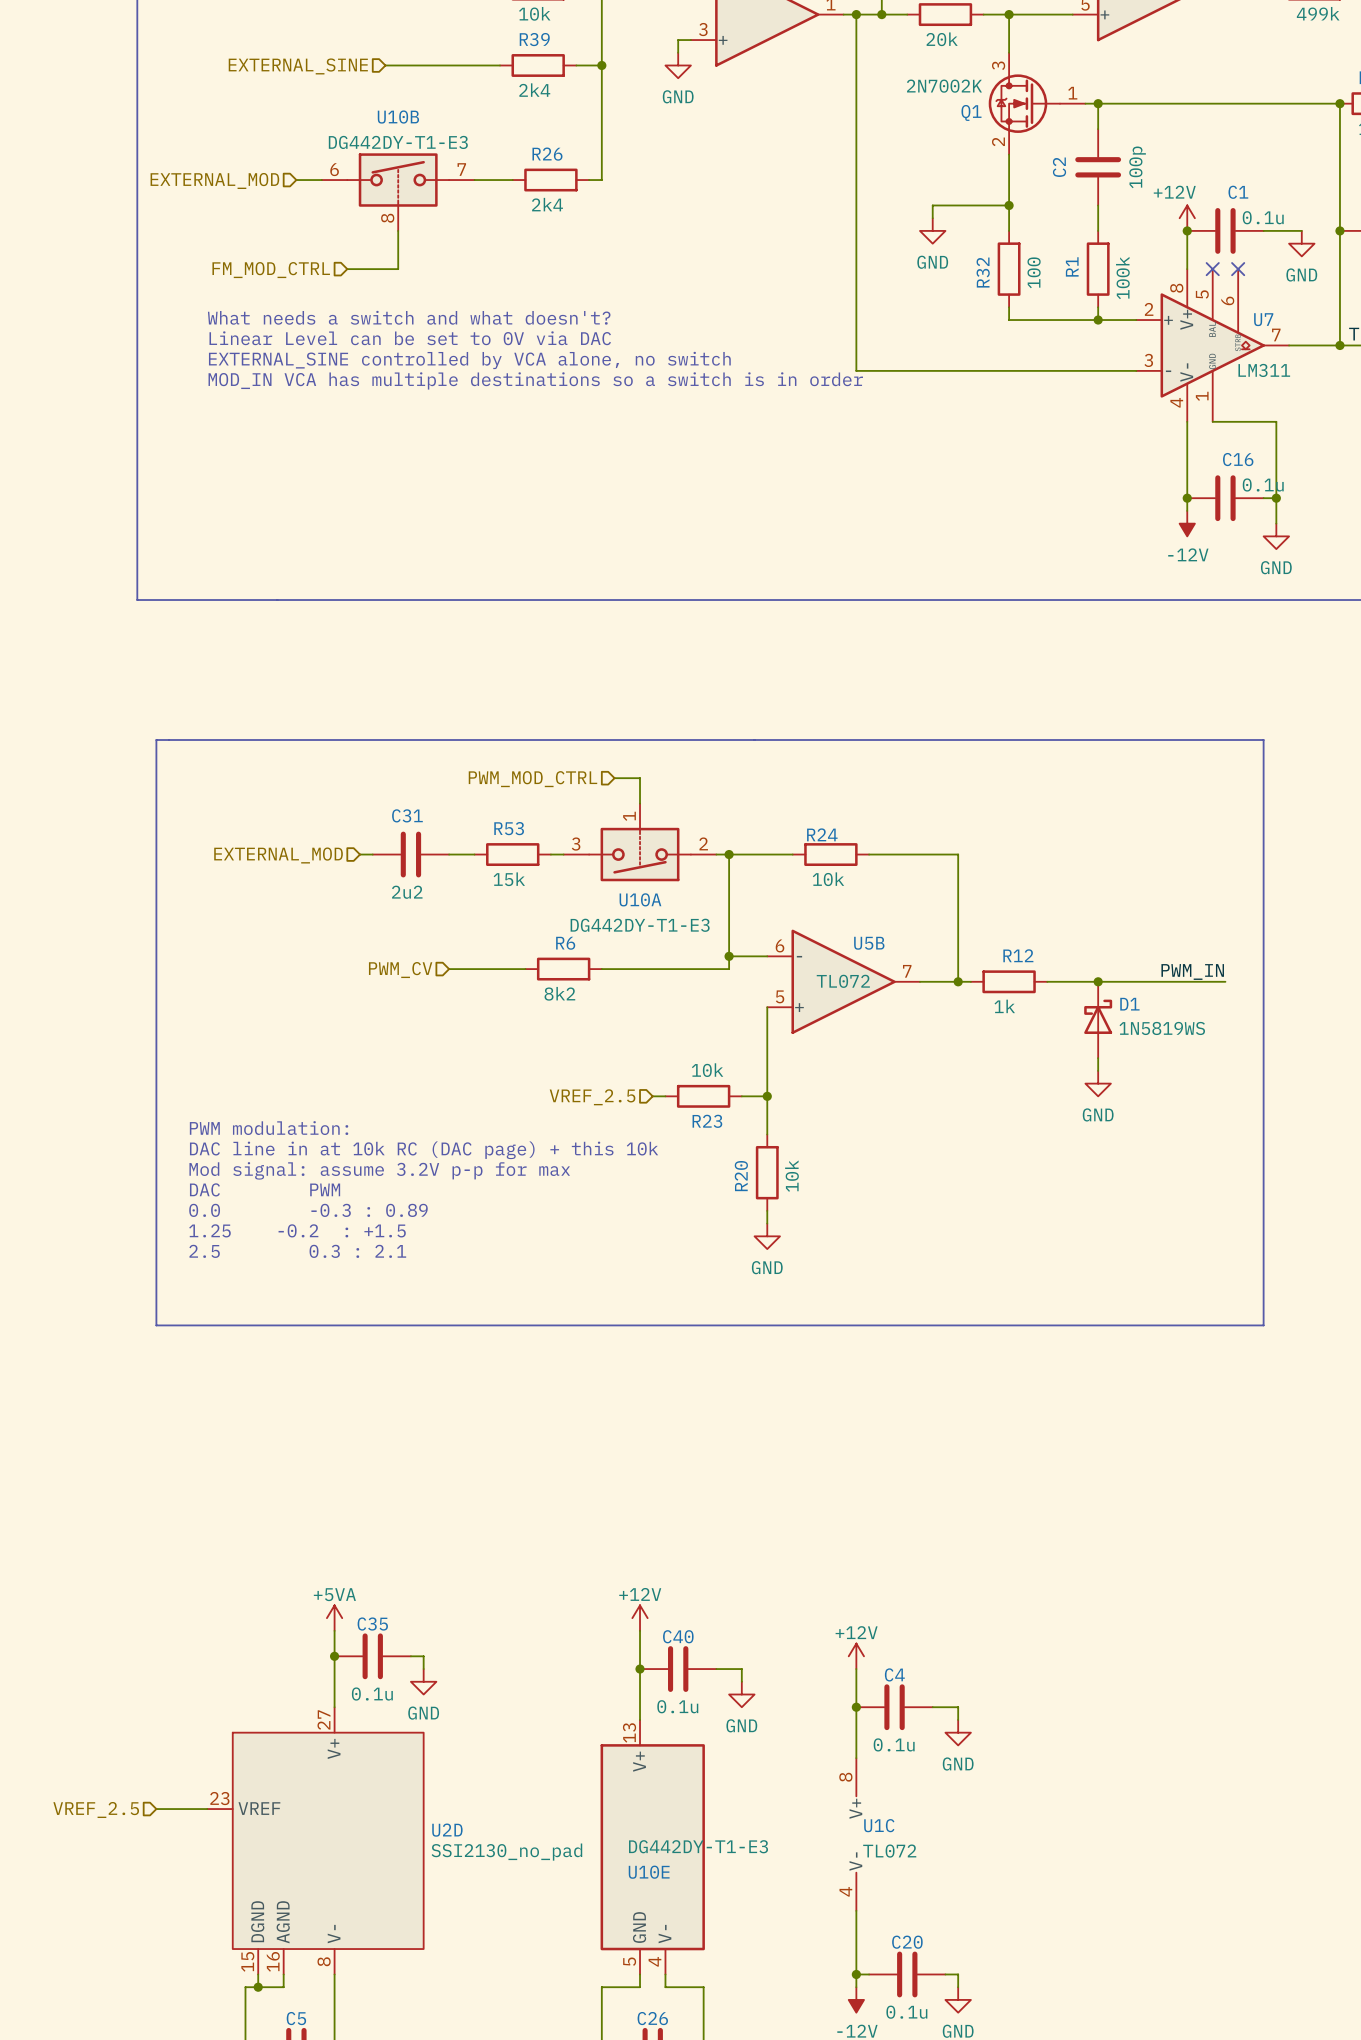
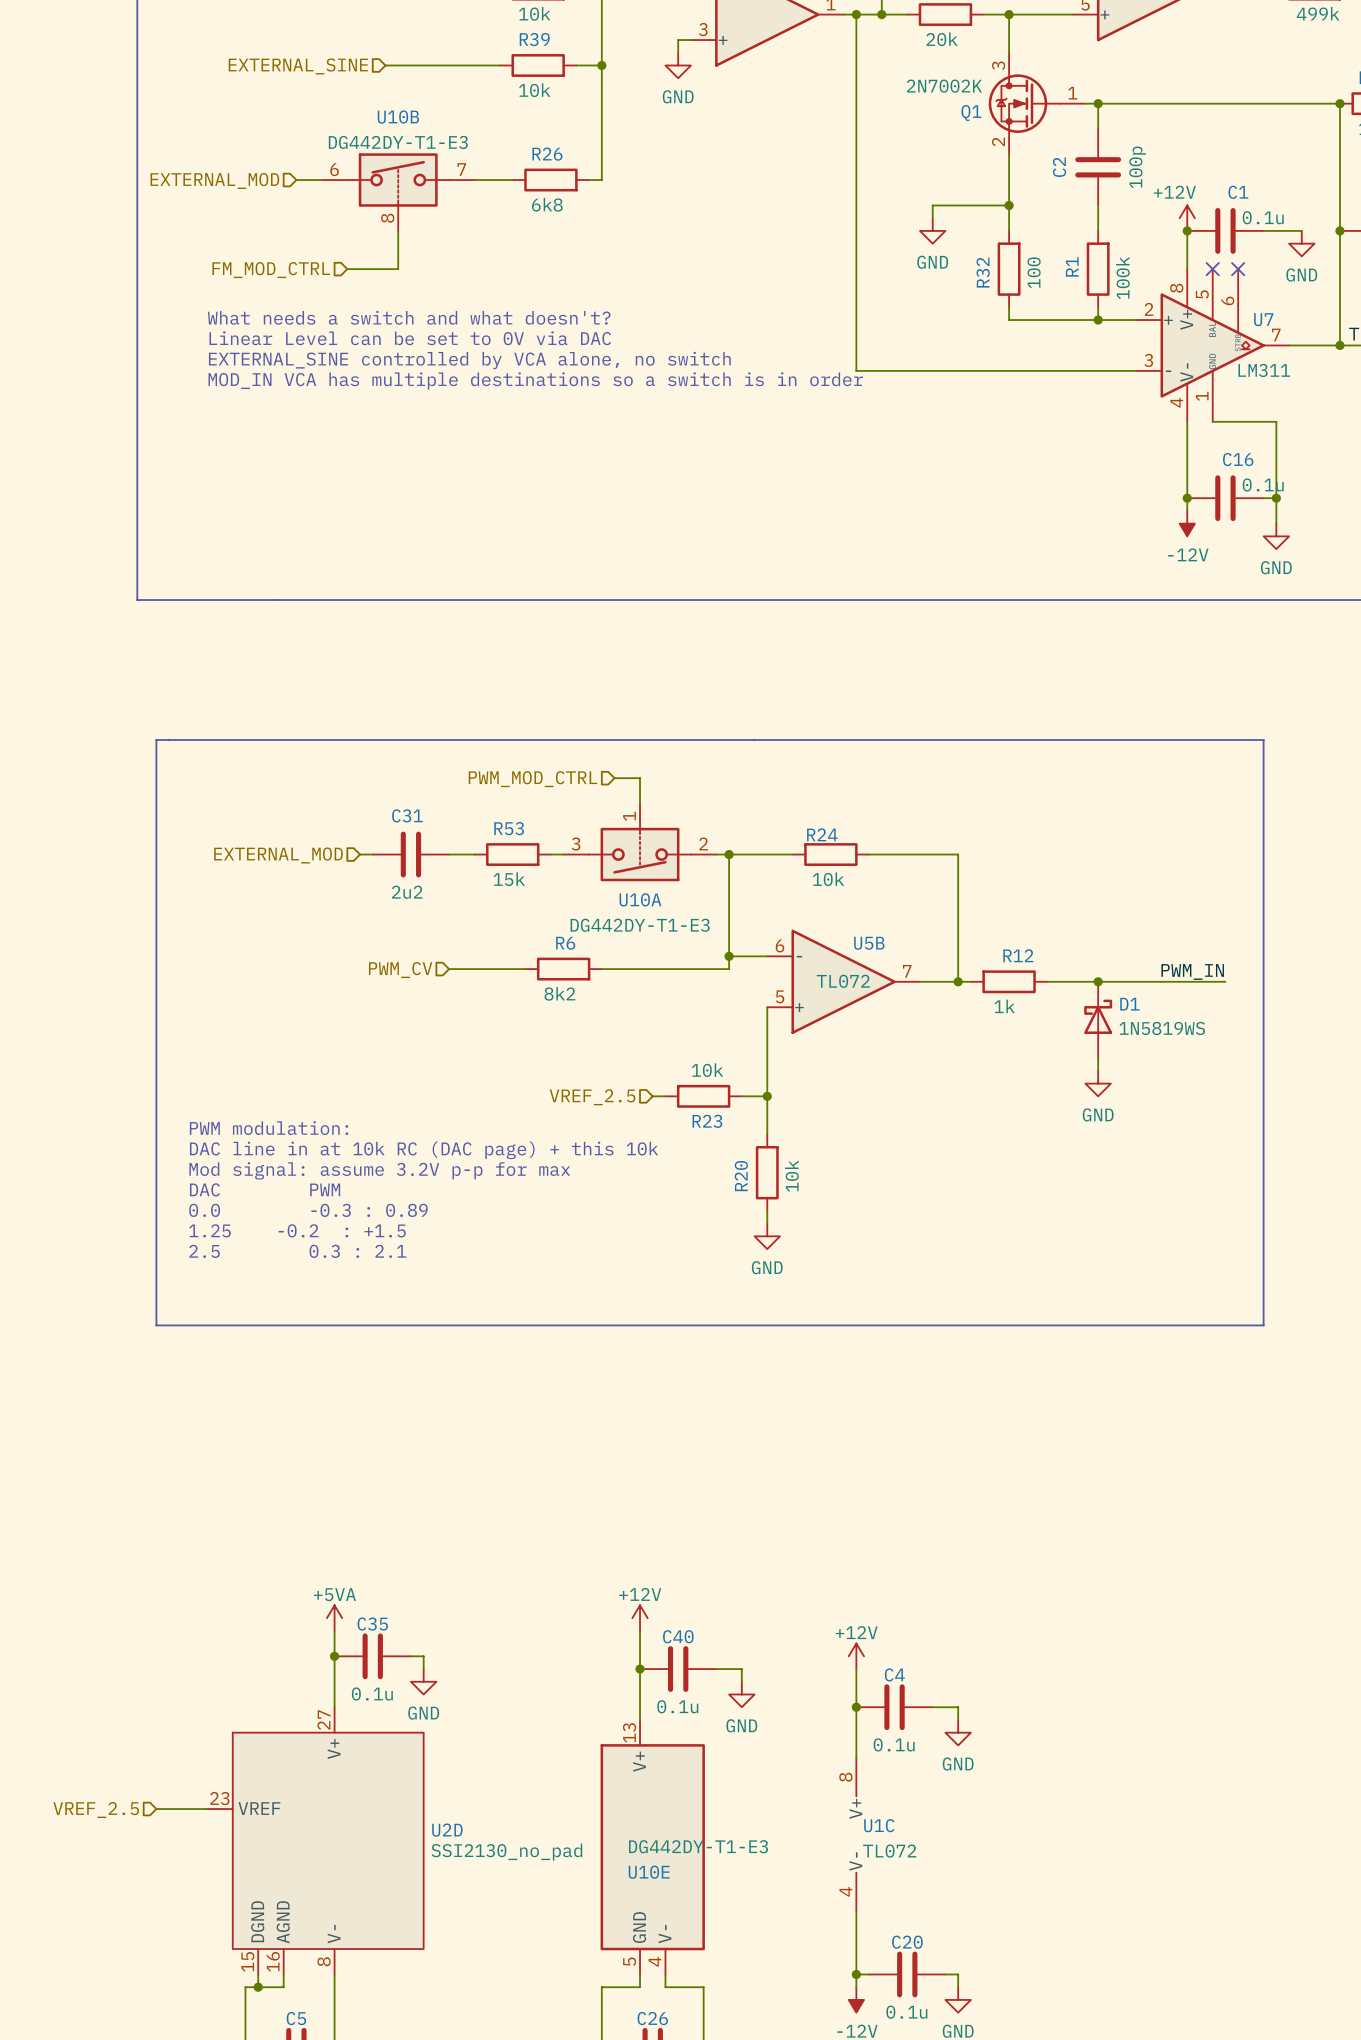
R39 value: 2k4 (534, 90) -> 10k (534, 90)
R26 value: 2k4 (547, 204) -> 6k8 (547, 204)

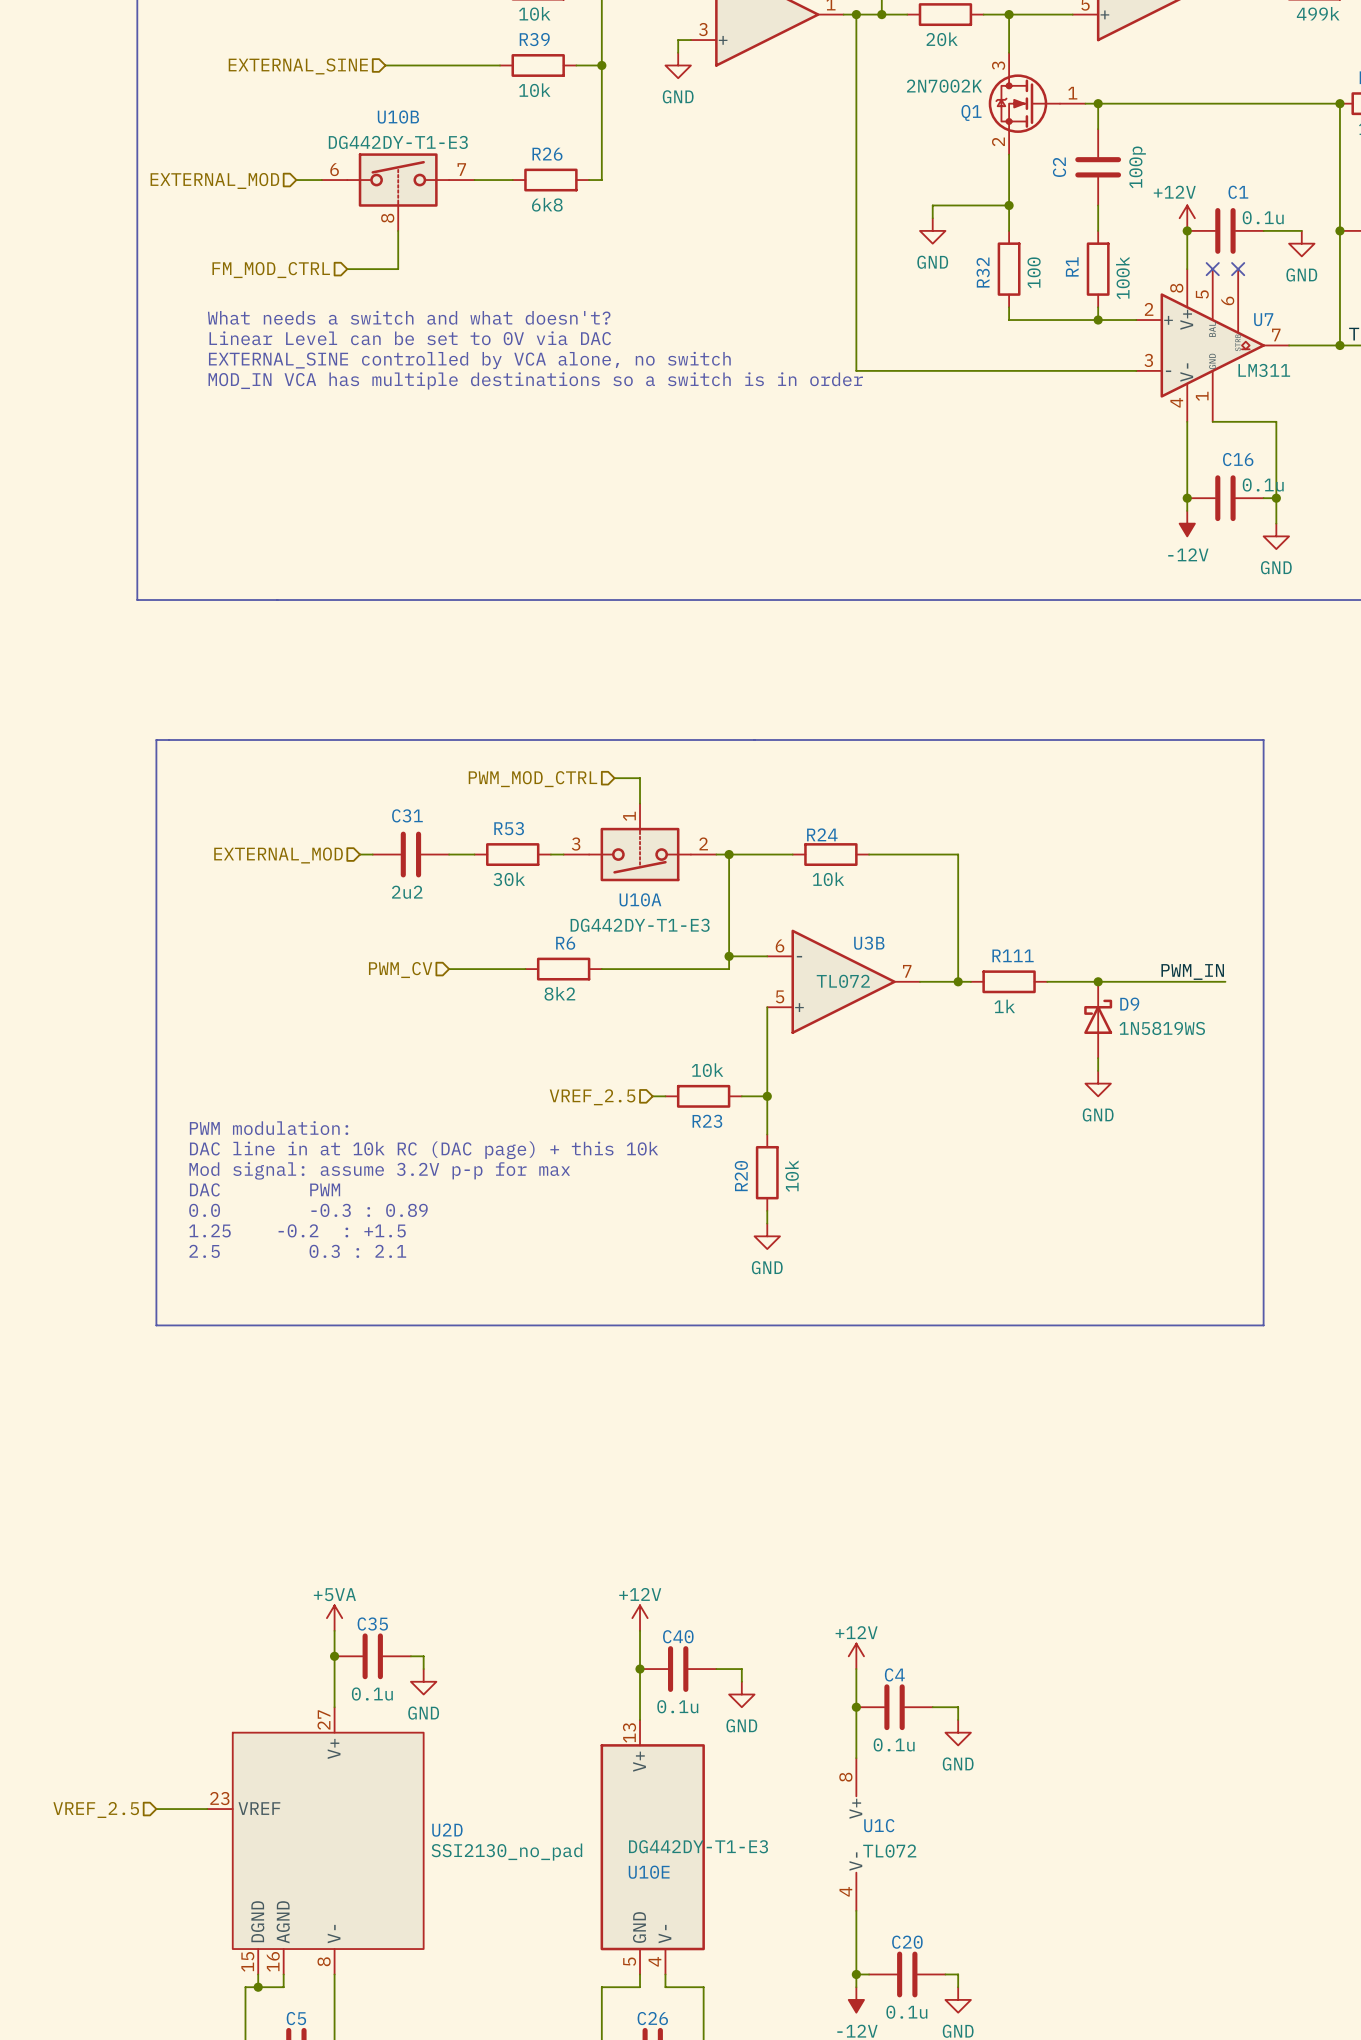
R53 value: 15k (509, 879) -> 30k (509, 879)
U5B name: U5B (869, 943) -> U3B (869, 943)
R12 name: R12 (1018, 955) -> R111 (1013, 955)
D1 name: D1 (1129, 1004) -> D9 (1129, 1004)

